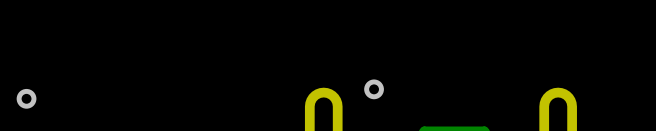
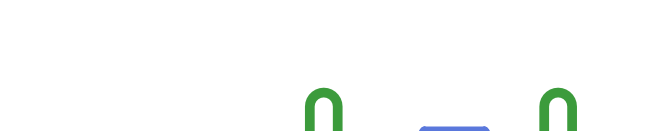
via: (374, 89) -> none
via: (26, 98) -> none

